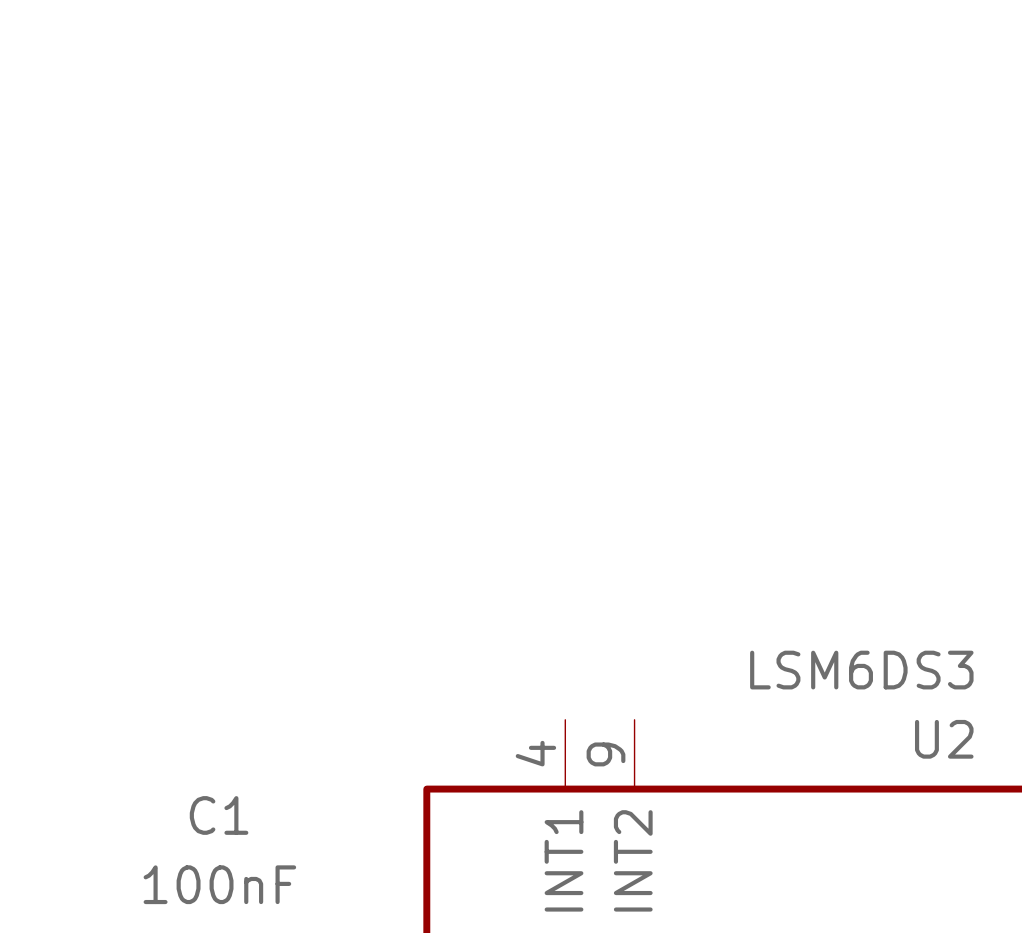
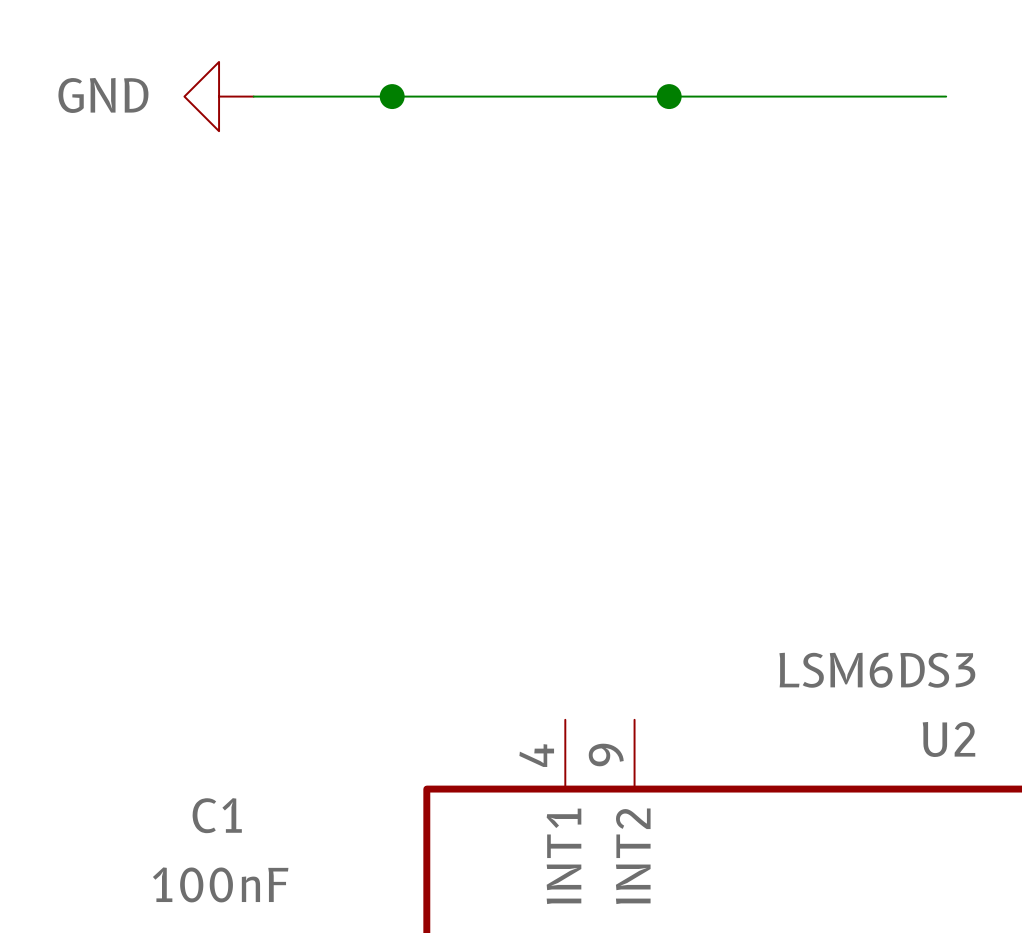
power symbol: none -> GND (219, 96)
wire: none -> (253, 96) (946, 96)
junction: none -> (392, 96)
junction: none -> (669, 96)

